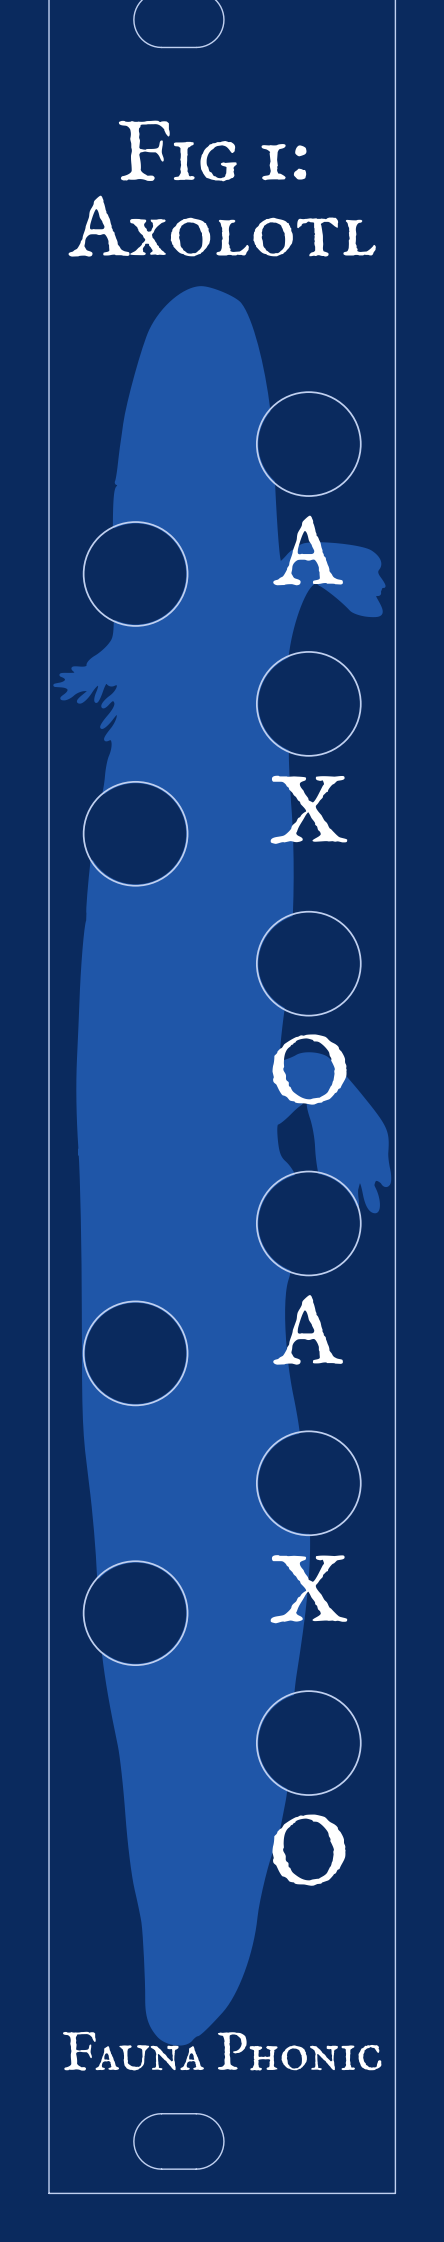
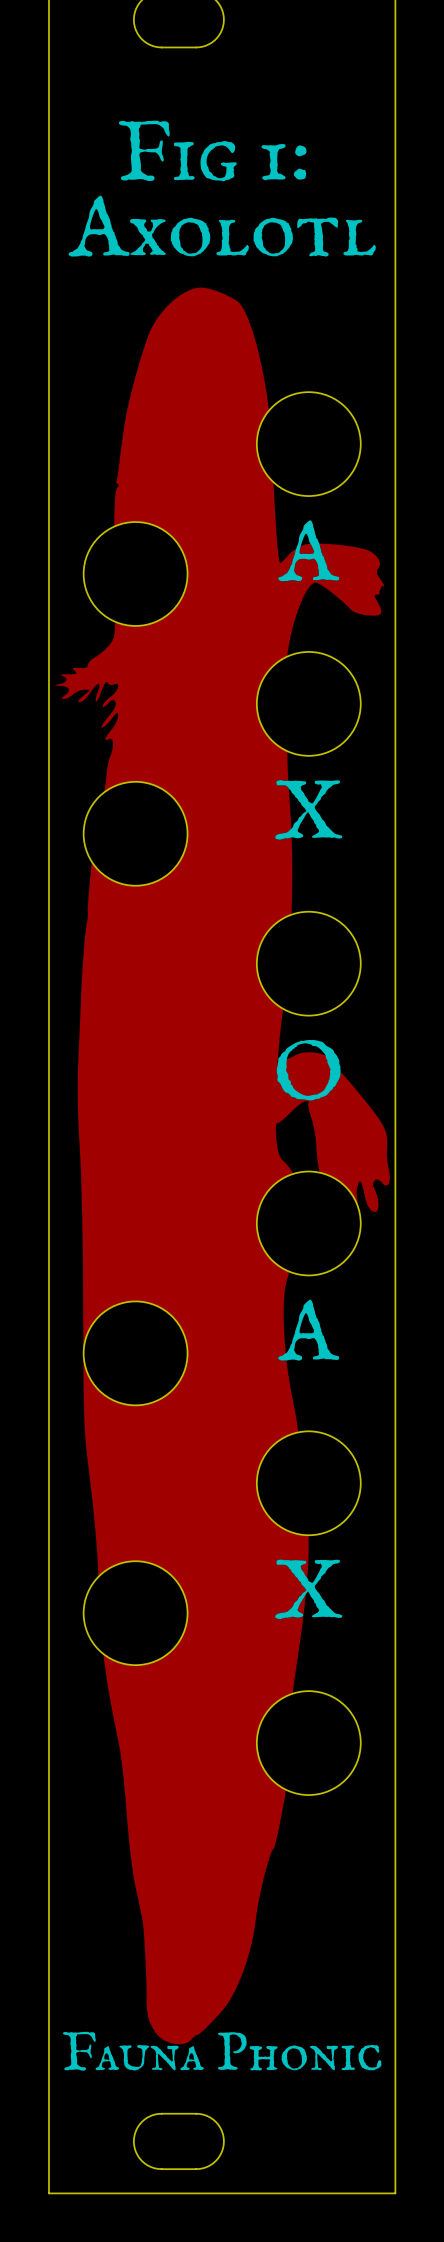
drawing: [53, 286, 392, 2046] -> none
drawing: none -> [54, 287, 390, 2045]
drawing shape: [273, 515, 343, 586] -> [278, 520, 340, 582]
drawing shape: [270, 775, 348, 844] -> [275, 780, 343, 840]
drawing shape: [272, 1034, 347, 1105] -> [276, 1039, 341, 1101]
drawing shape: [273, 1295, 343, 1365] -> [278, 1299, 340, 1361]
drawing shape: [270, 1555, 348, 1624] -> [275, 1559, 343, 1620]

